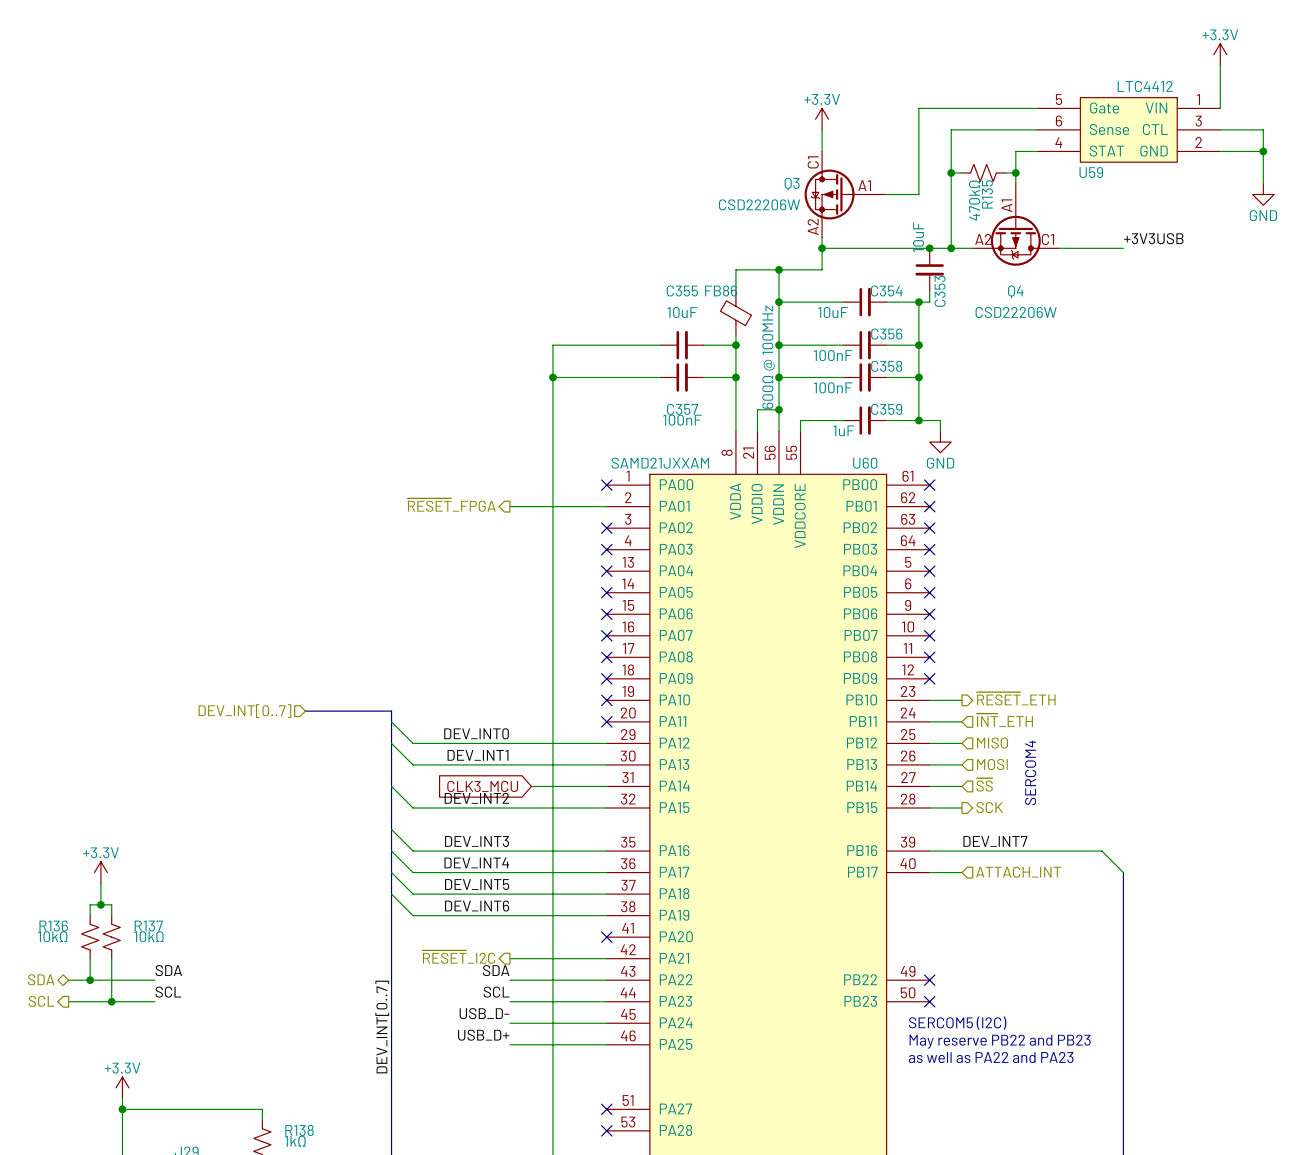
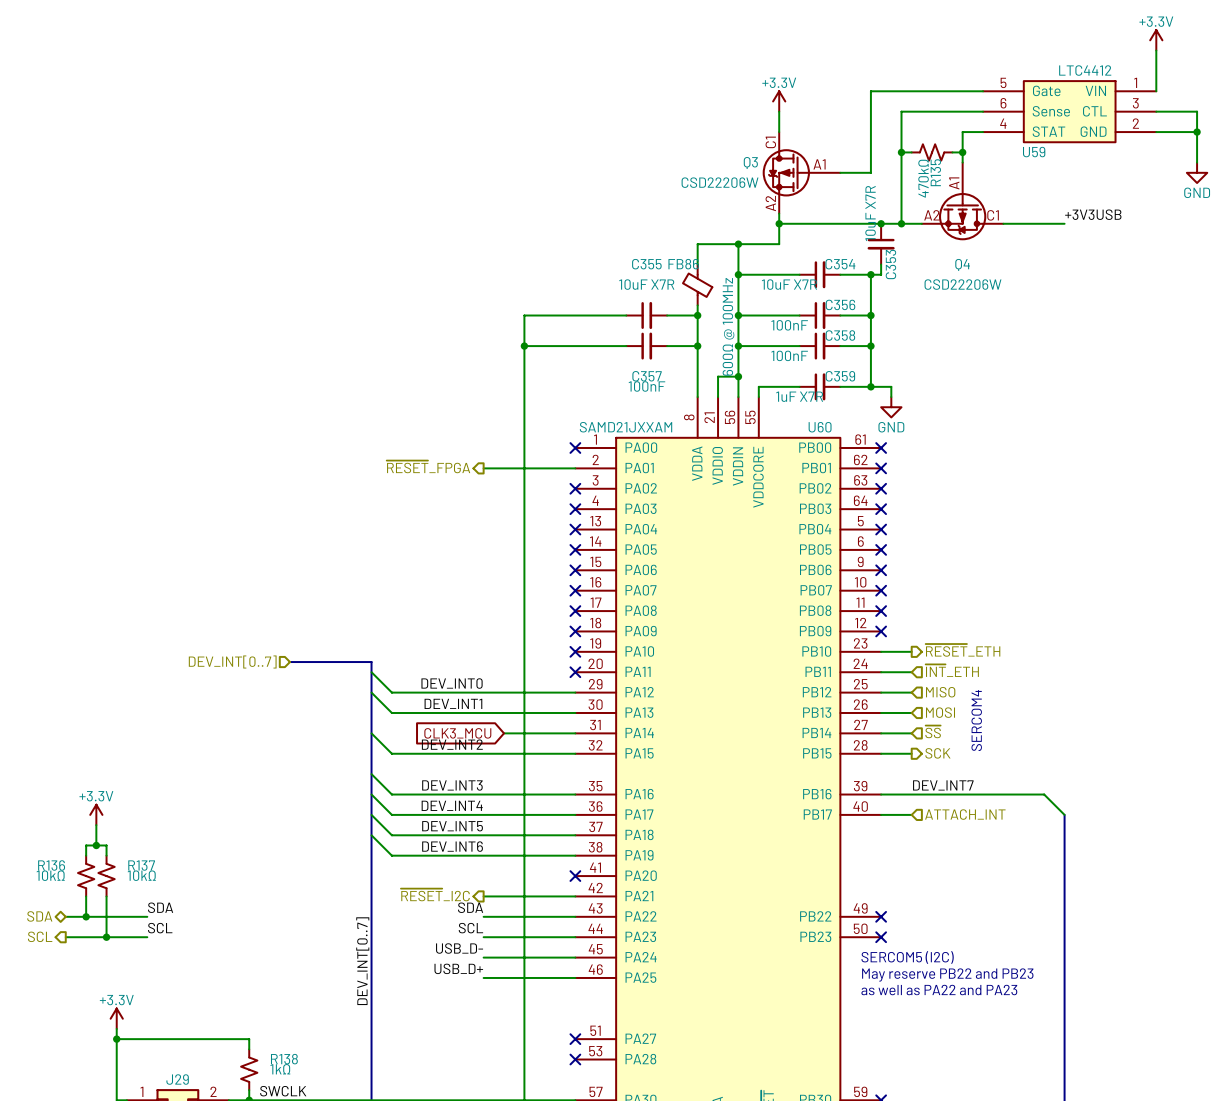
C353 value: 10uF (918, 237) -> 10uF X7R (870, 213)
C355 value: 10uF (682, 312) -> 10uF X7R (646, 284)
C354 value: 10uF (833, 312) -> 10uF X7R (789, 284)
C359 value: 1uF (843, 430) -> 1uF X7R (799, 396)

